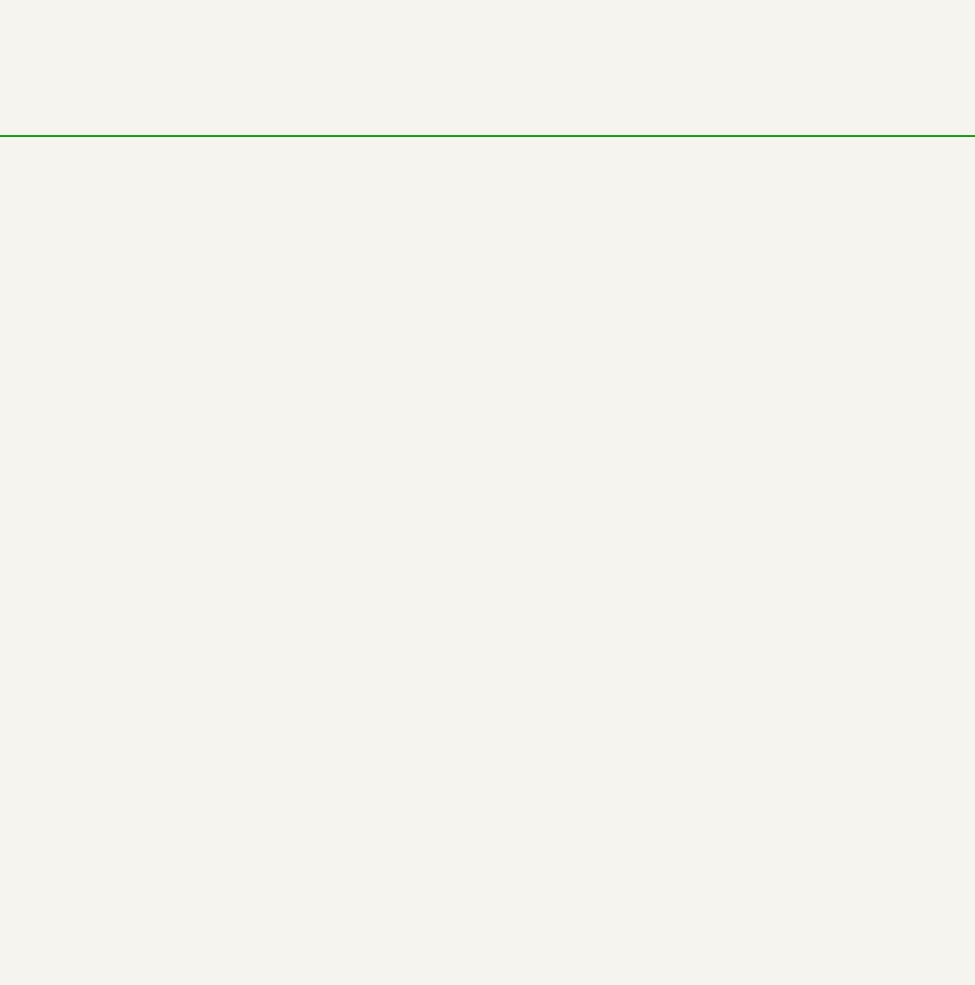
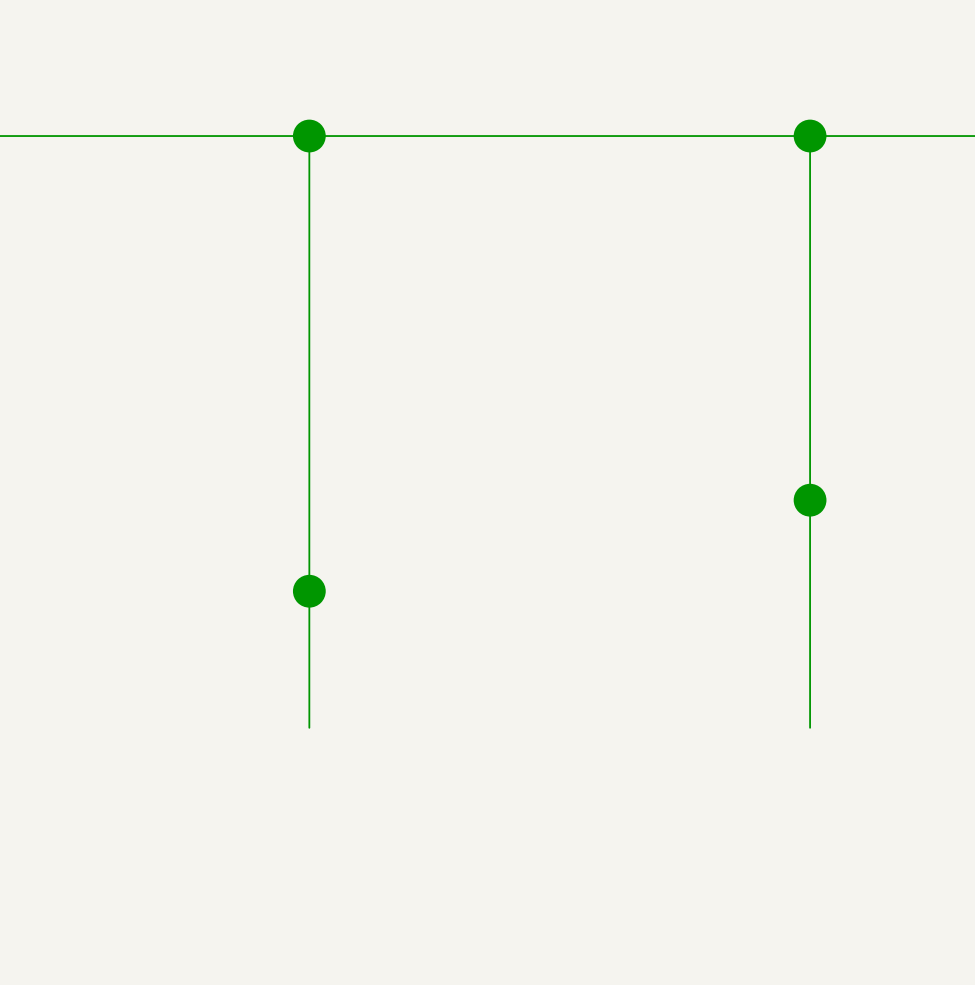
wire: none -> (309, 136) (309, 727)
junction: none -> (309, 136)
wire: none -> (810, 136) (810, 727)
junction: none -> (810, 136)
junction: none -> (810, 500)
junction: none -> (309, 591)

